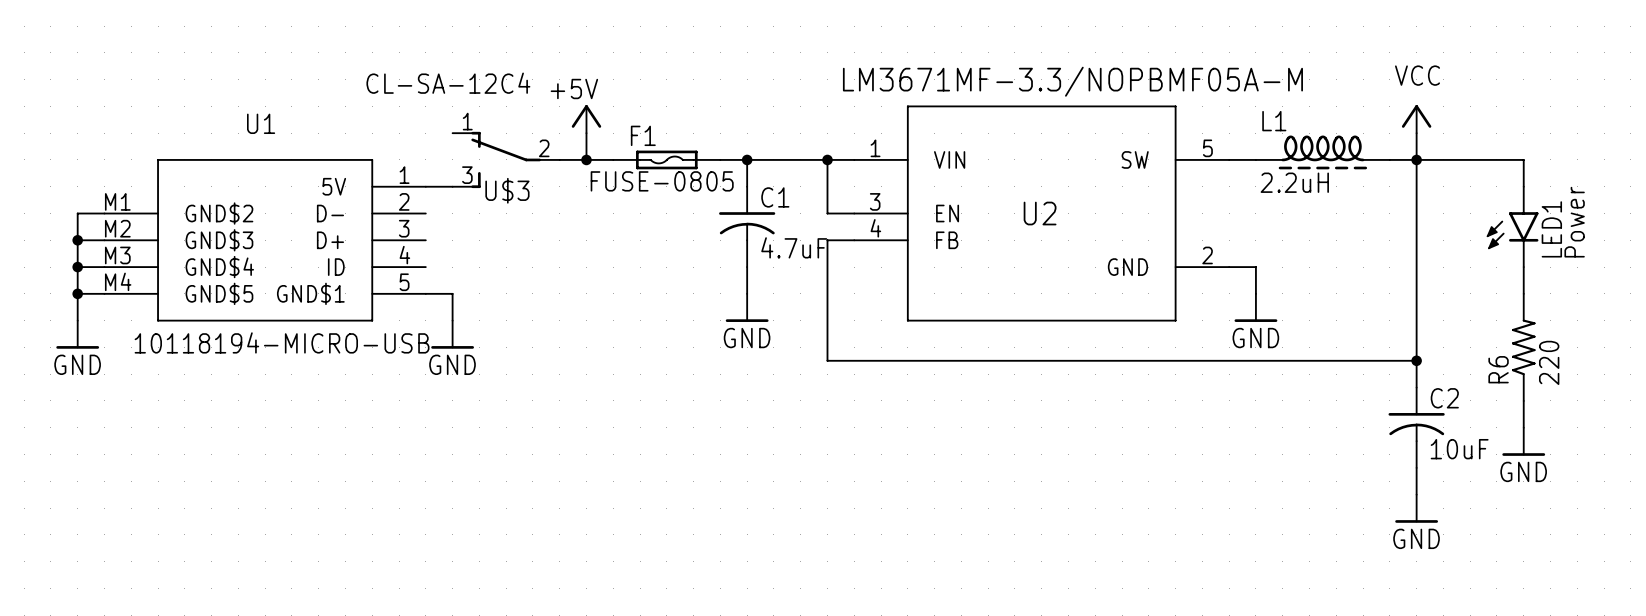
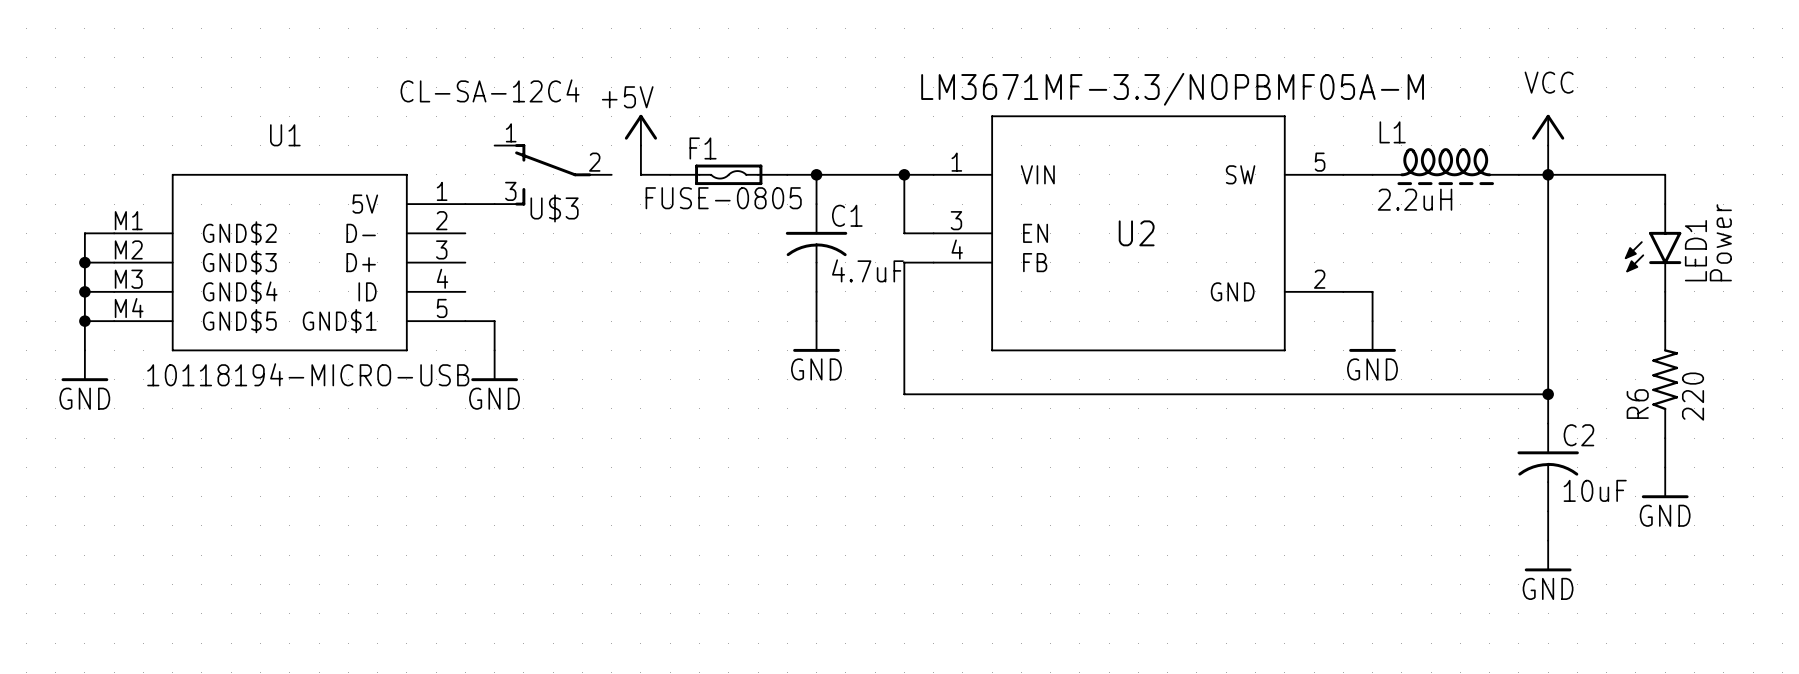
wire: (559, 159) (586, 159) -> none
junction: (586, 159) -> none

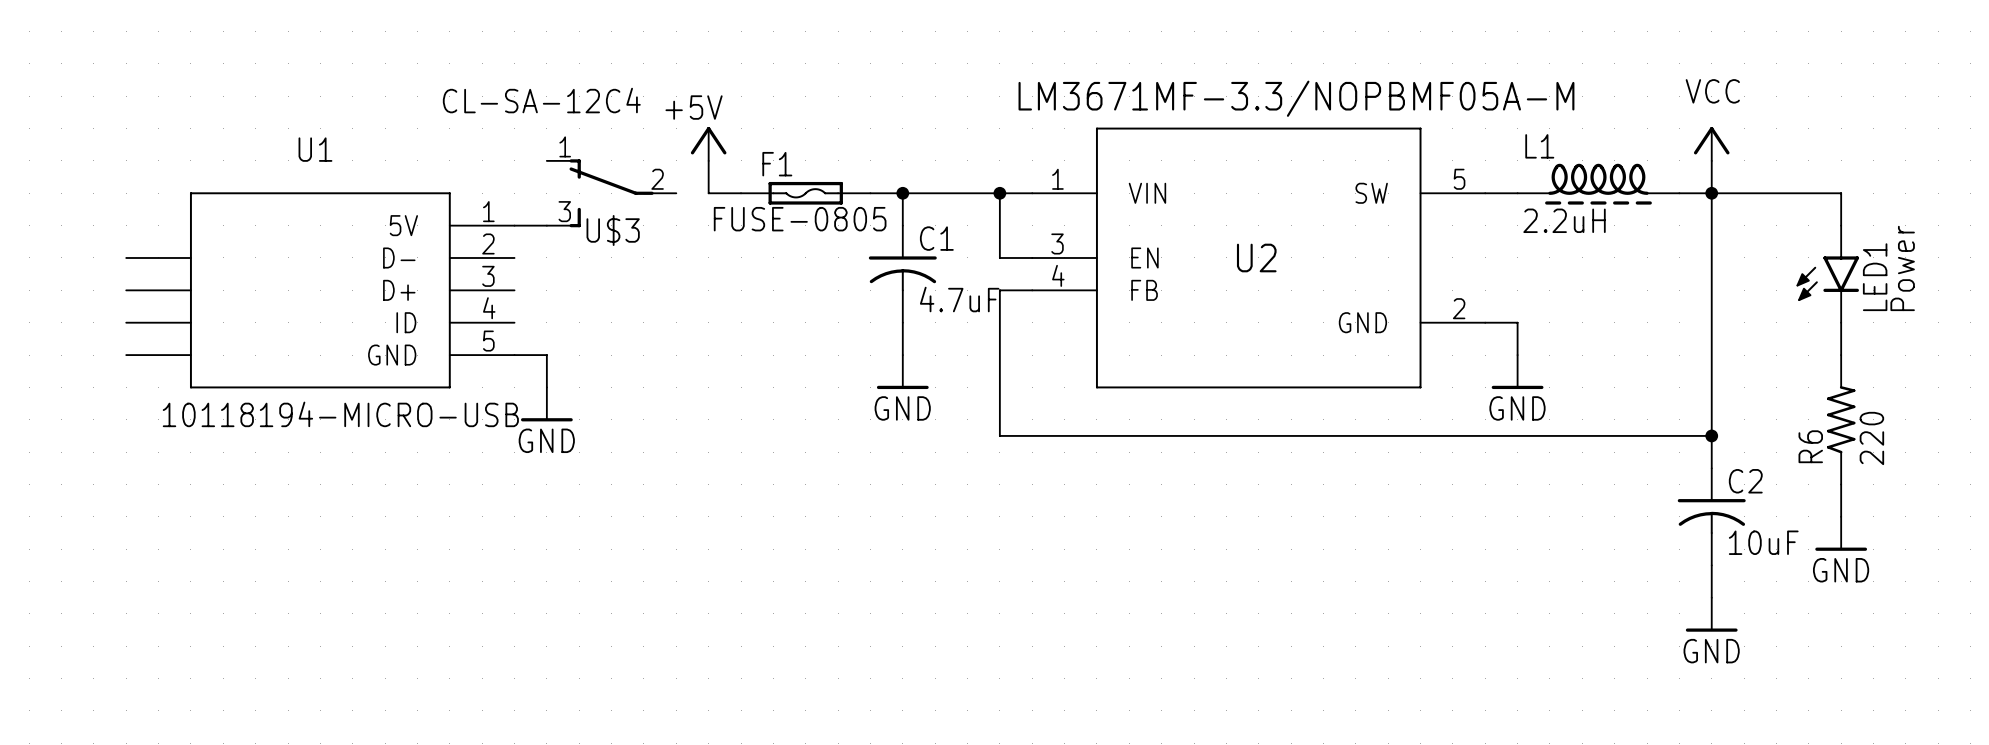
U1 symbol: [114, 173, 466, 352] -> [126, 192, 515, 389]
wire: (114, 233) (84, 233) (84, 350) -> none
wire: (84, 262) (114, 262) -> none
junction: (84, 262) -> none
wire: (84, 291) (114, 291) -> none
junction: (84, 291) -> none
wire: (84, 321) (114, 321) -> none
junction: (84, 321) -> none
power symbol: GND (84, 365) -> none

